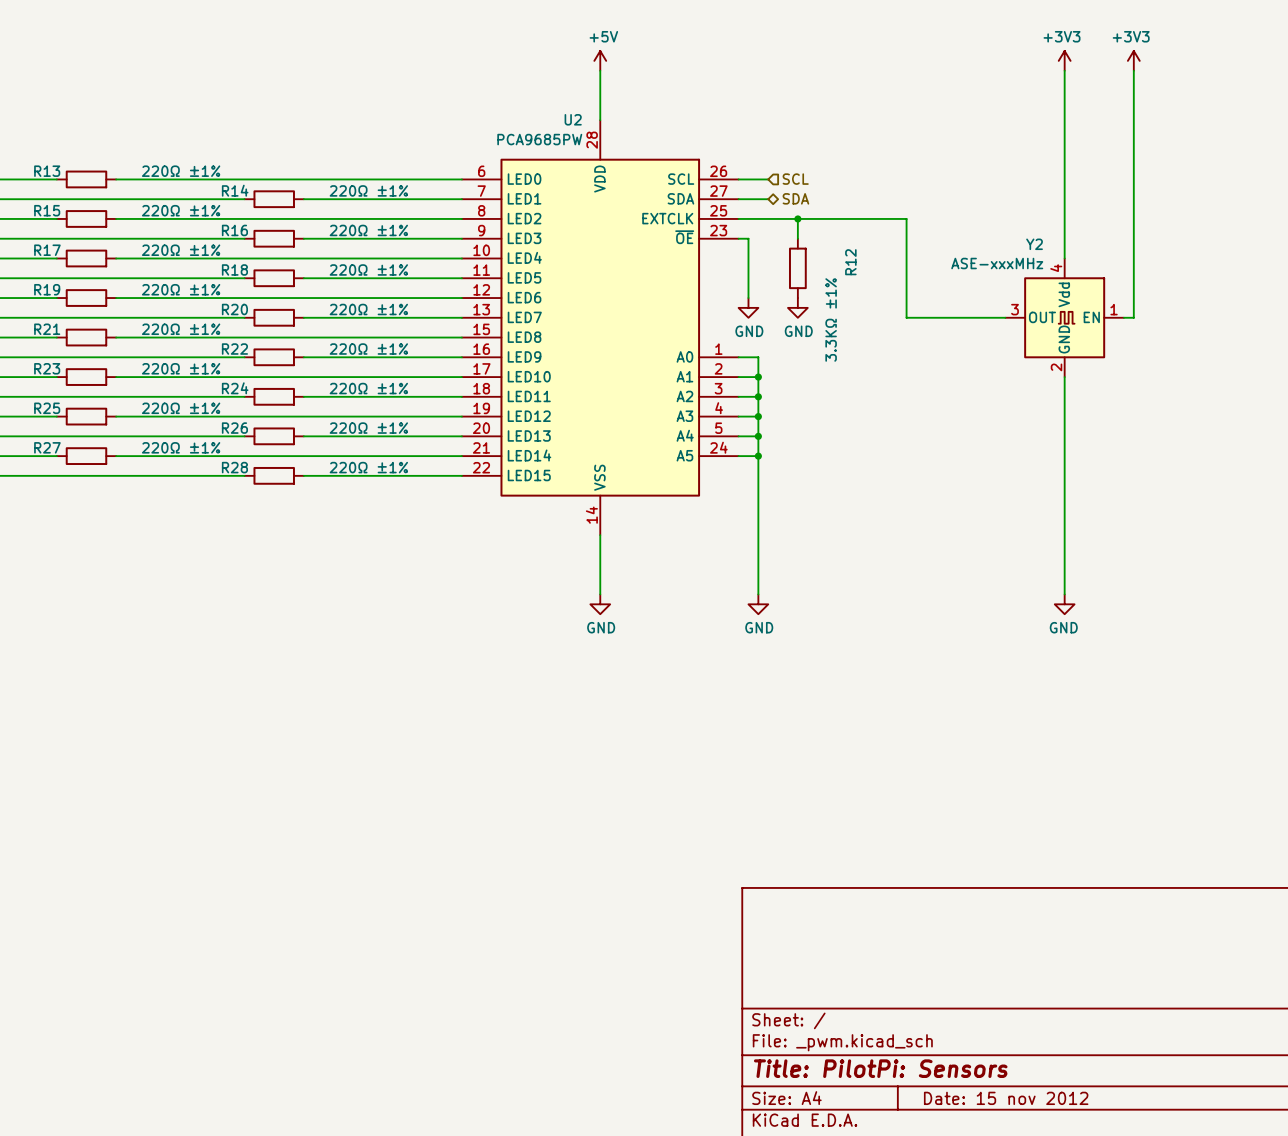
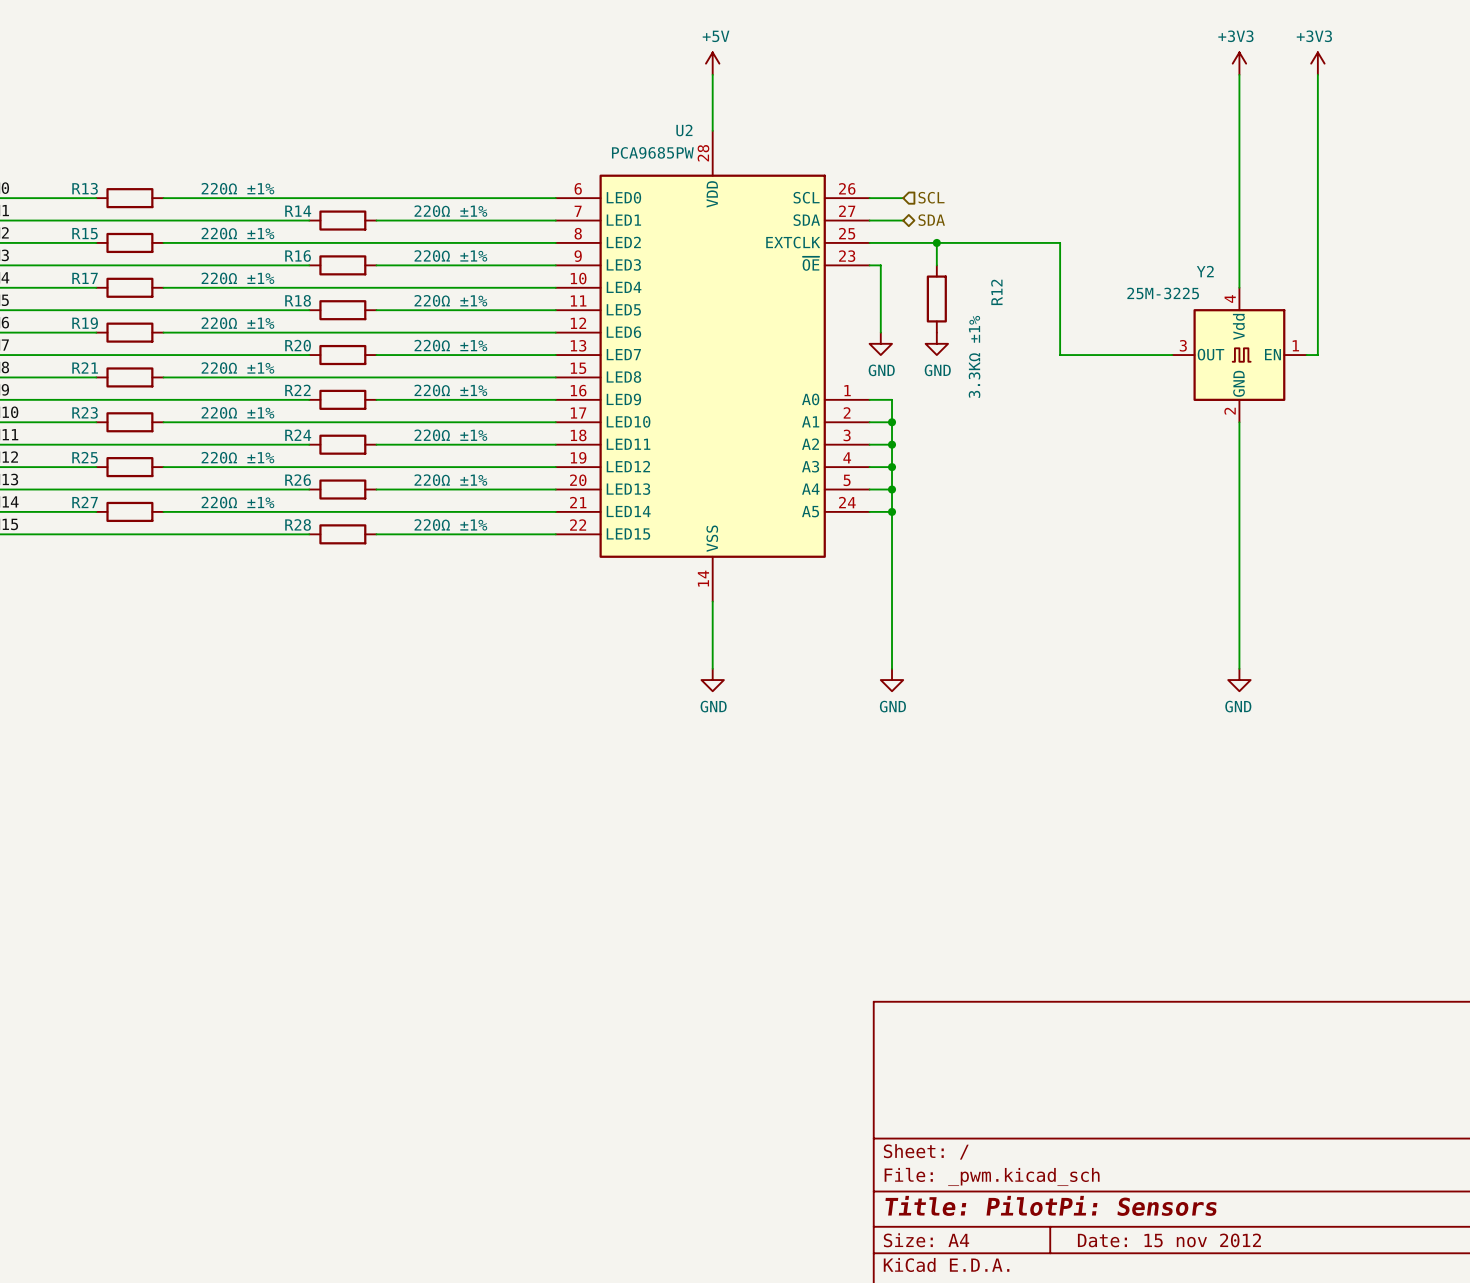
Y2 value: ASE-xxxMHz (997, 263) -> 25M-3225 (1163, 293)

